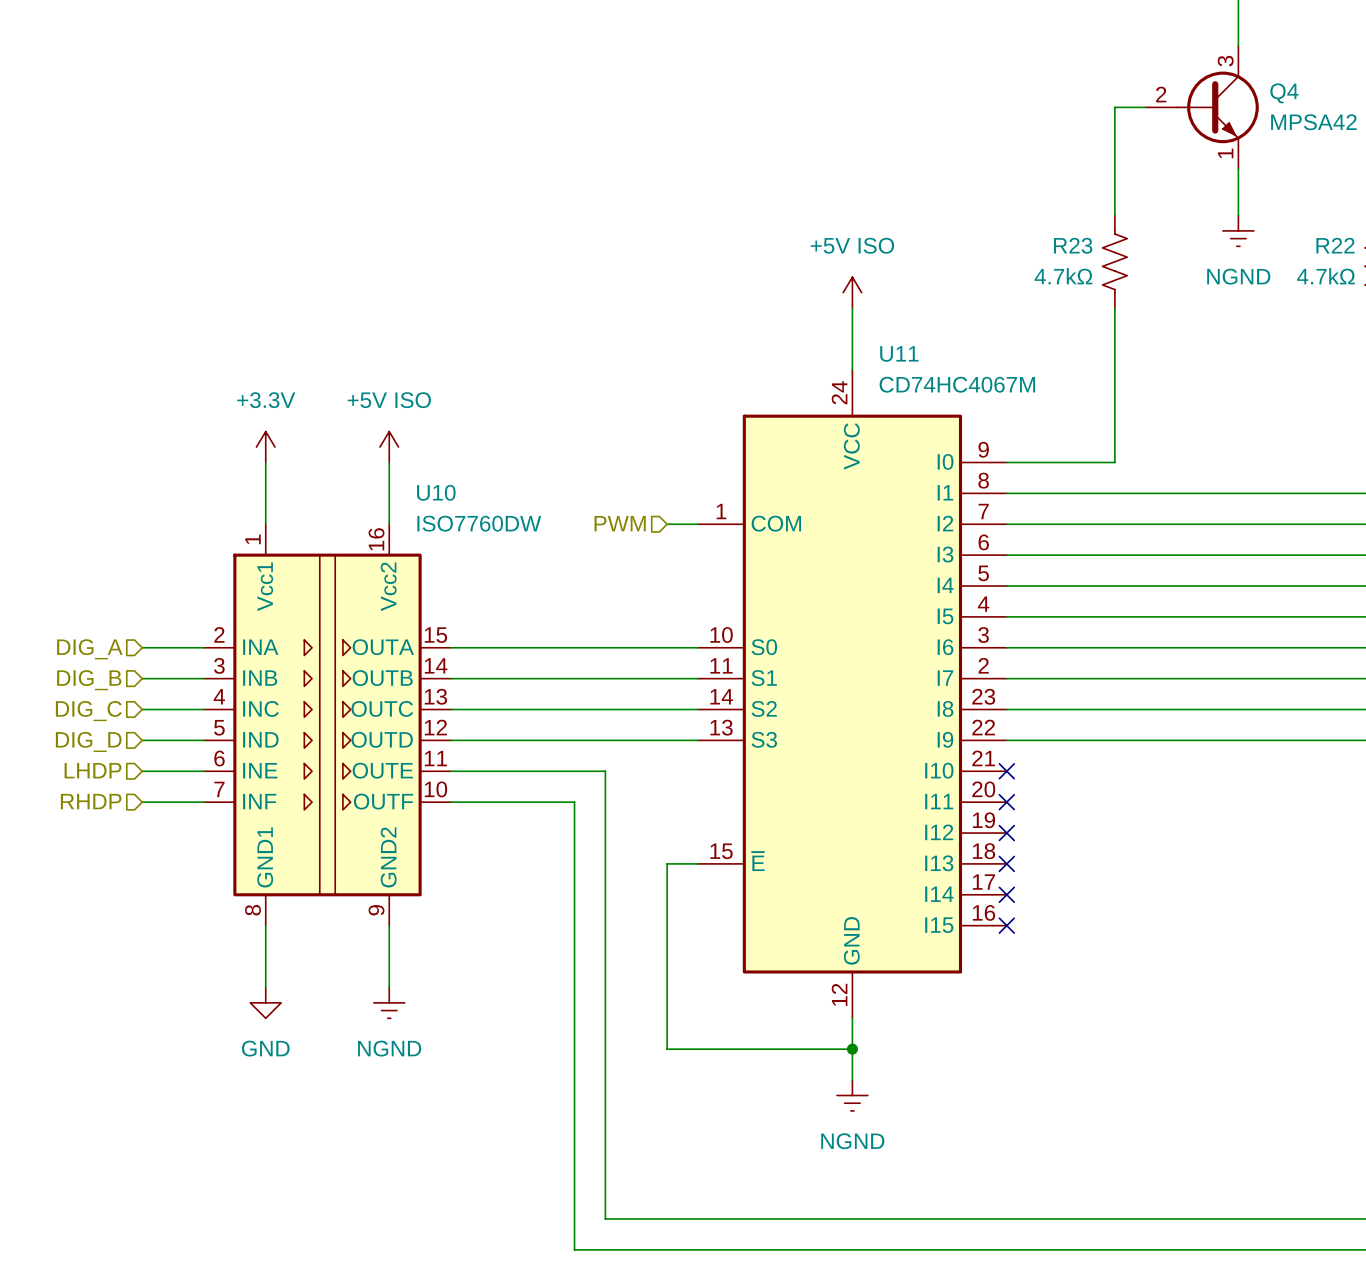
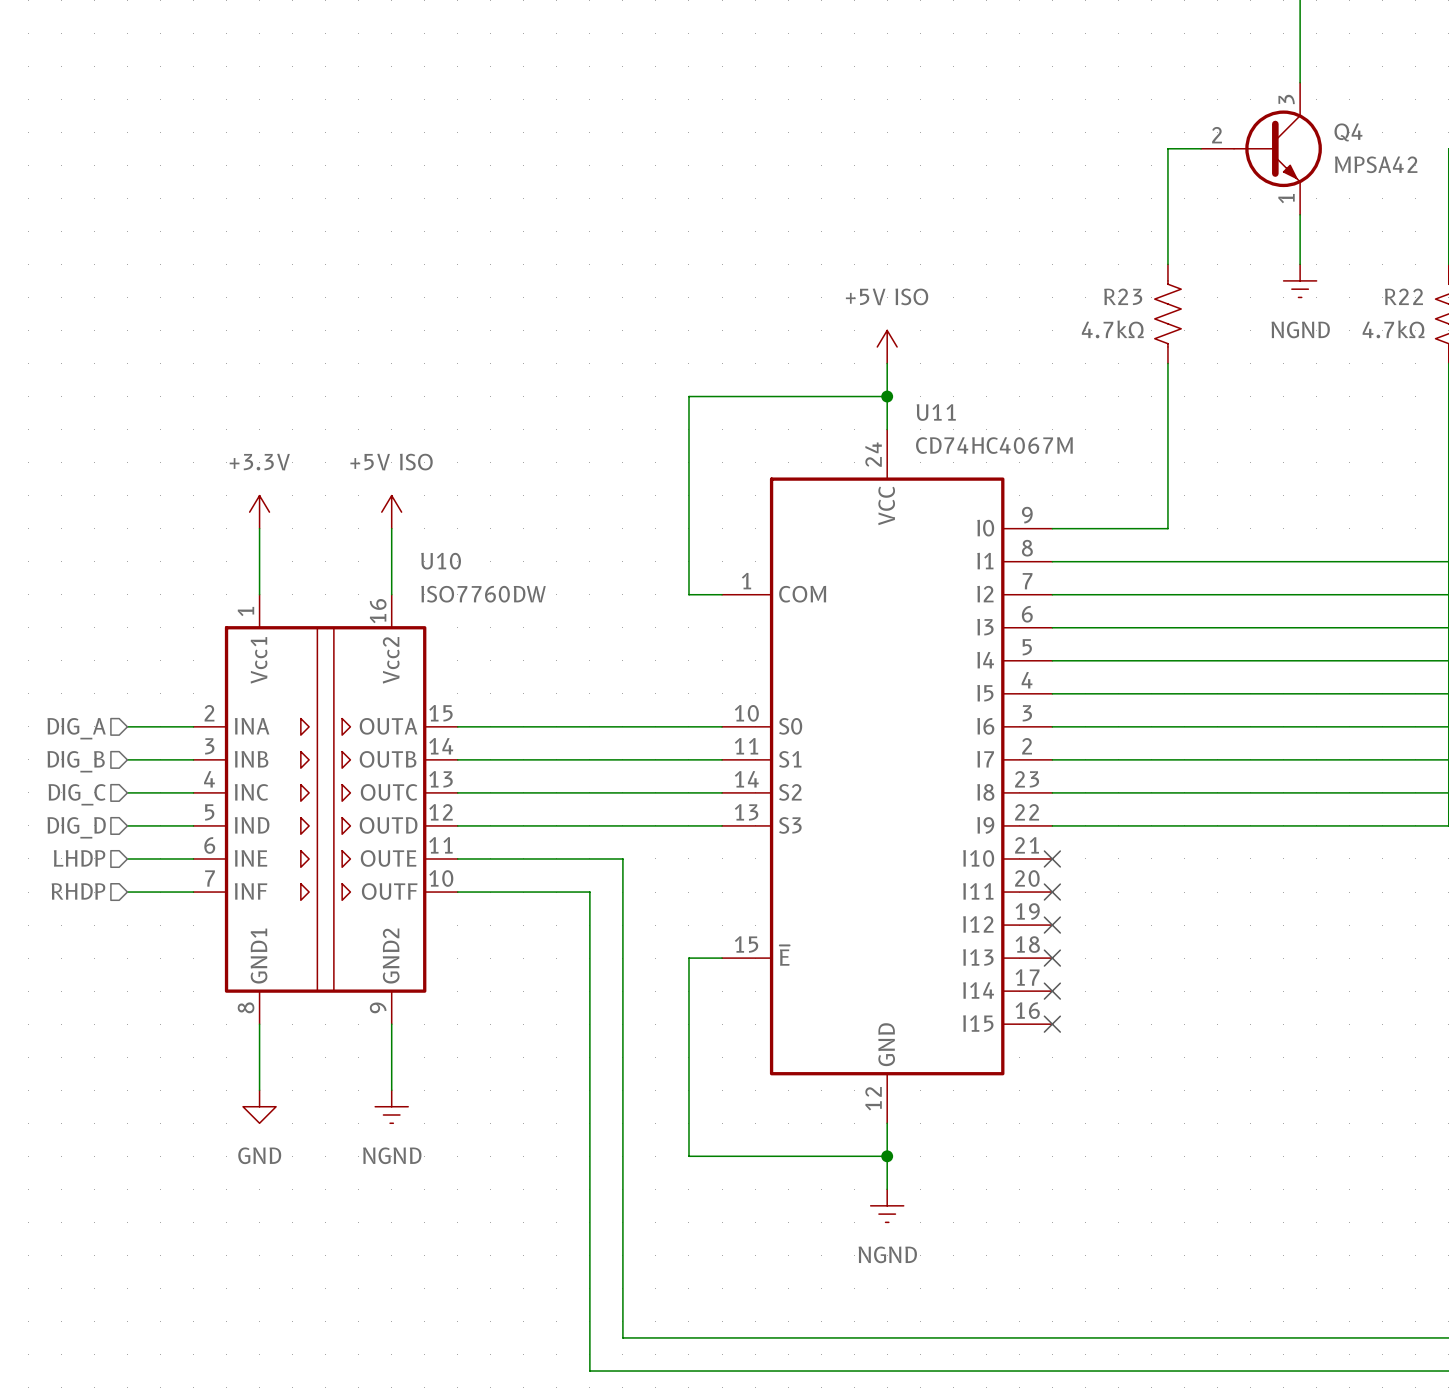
wire: none -> (887, 396) (688, 396) (688, 594)
junction: none -> (887, 396)
hierarchical label: PWM (620, 523) -> none

